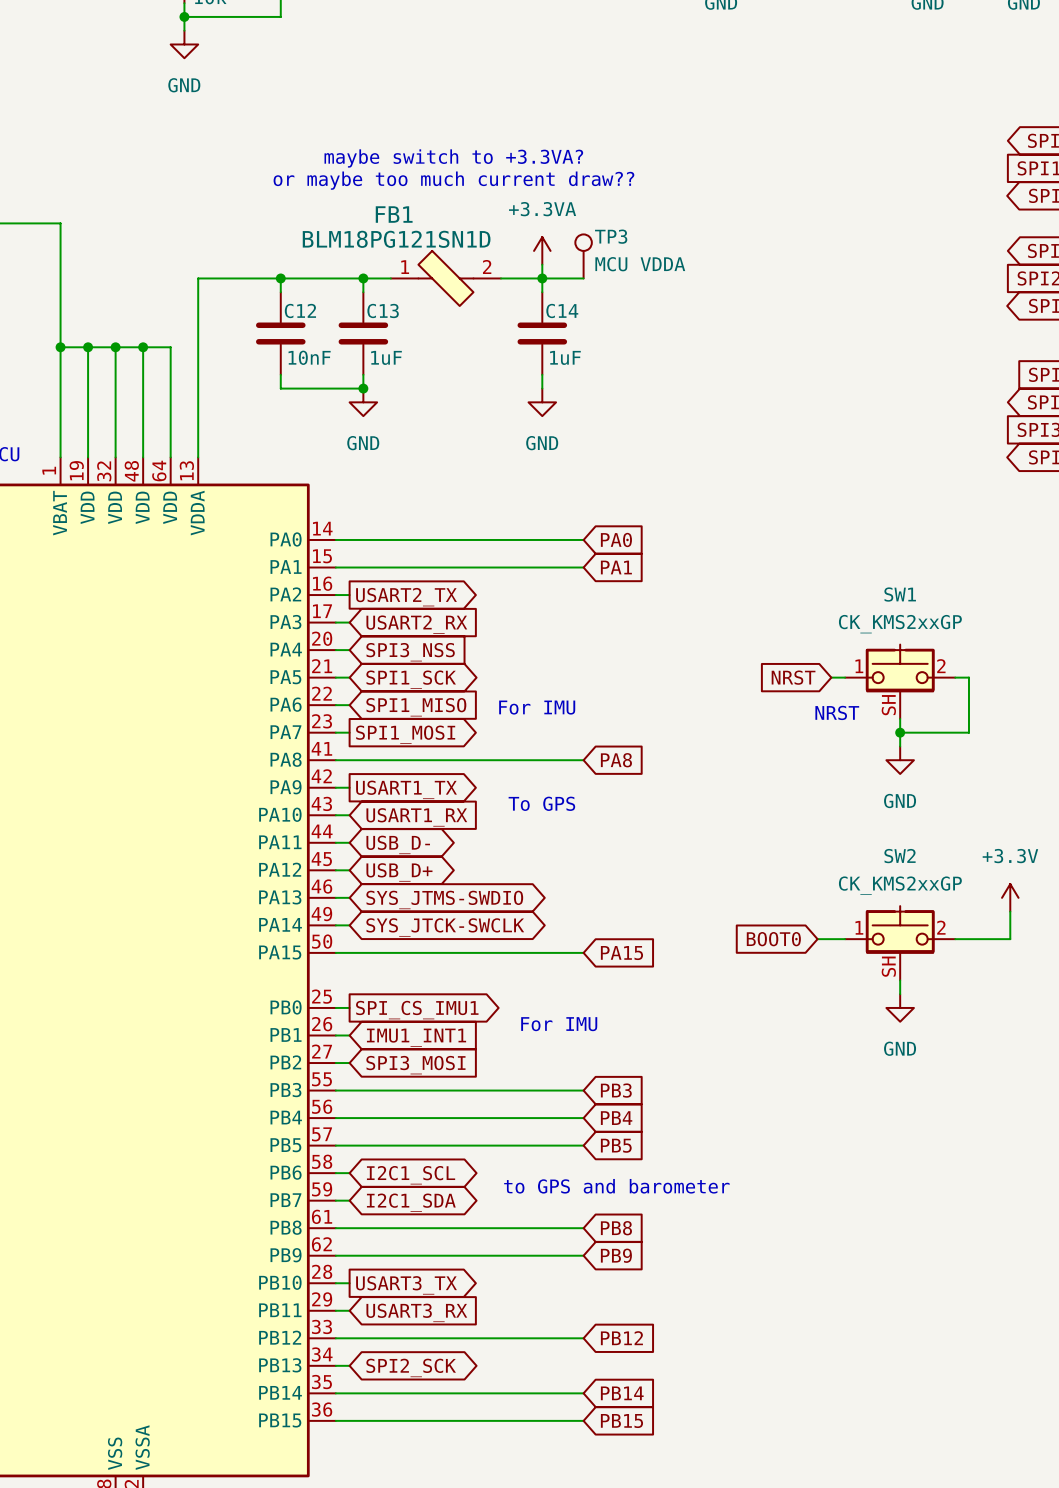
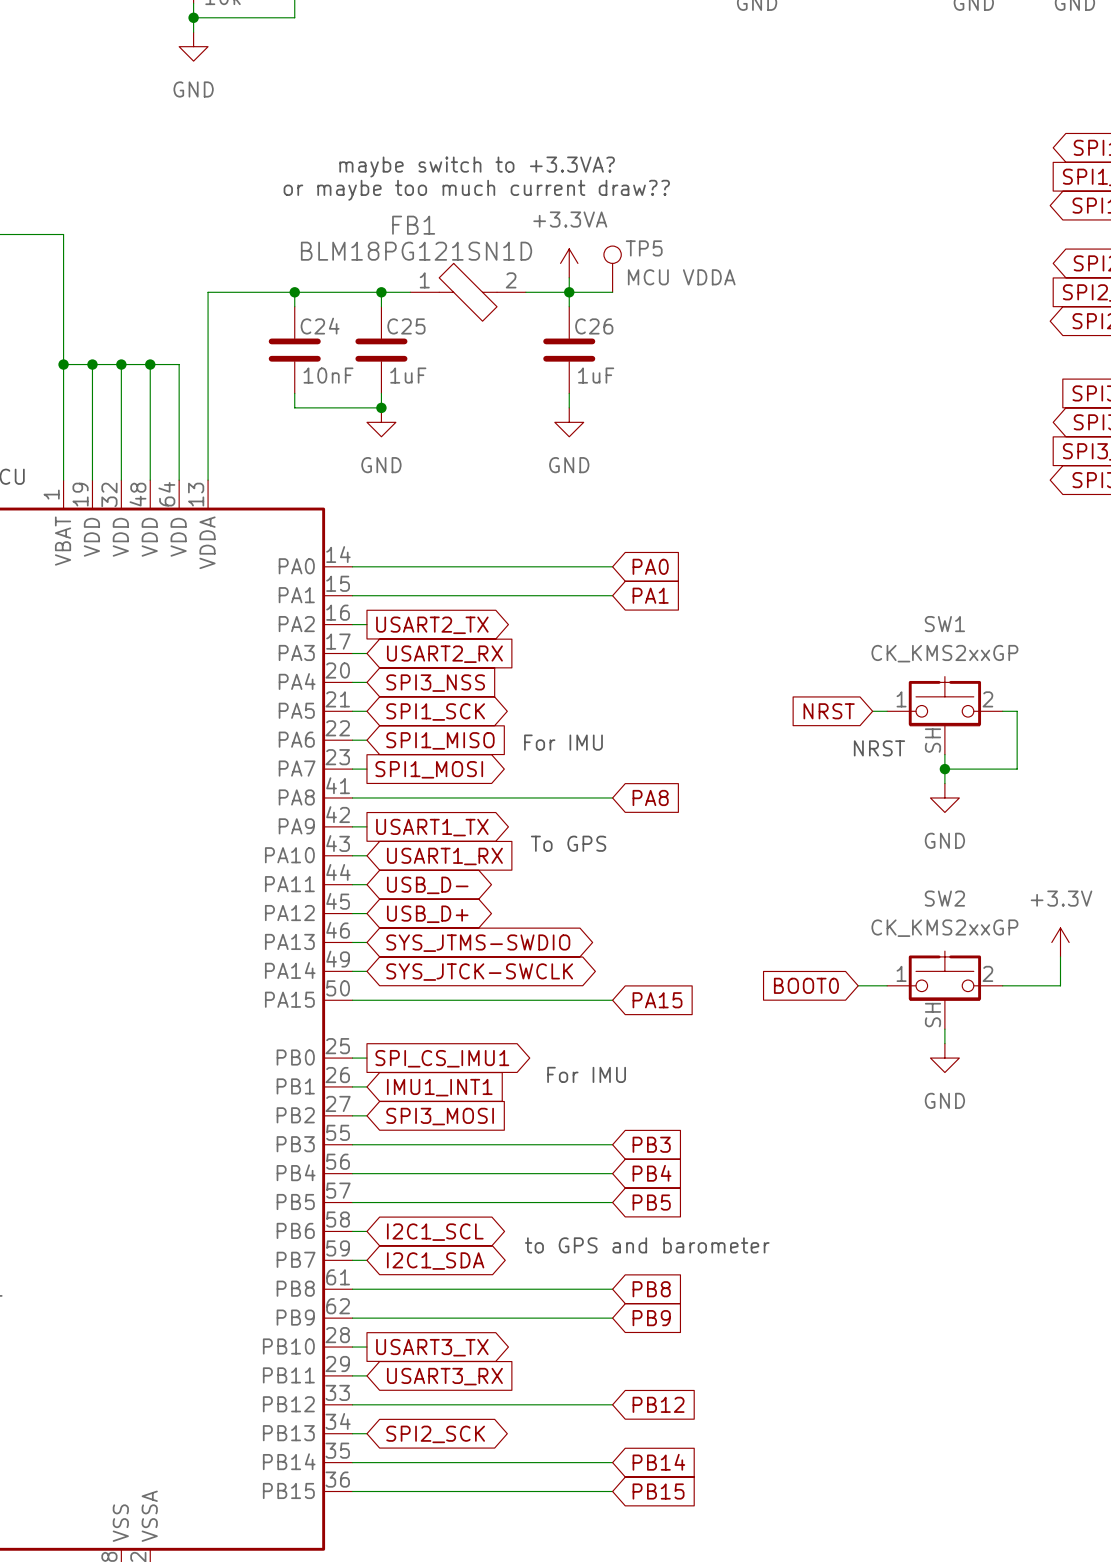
TP3 name: TP3 (611, 236) -> TP5 (644, 248)
C12 name: C12 (300, 310) -> C24 (320, 326)
C13 name: C13 (383, 310) -> C25 (406, 326)
C14 name: C14 (562, 310) -> C26 (594, 326)

